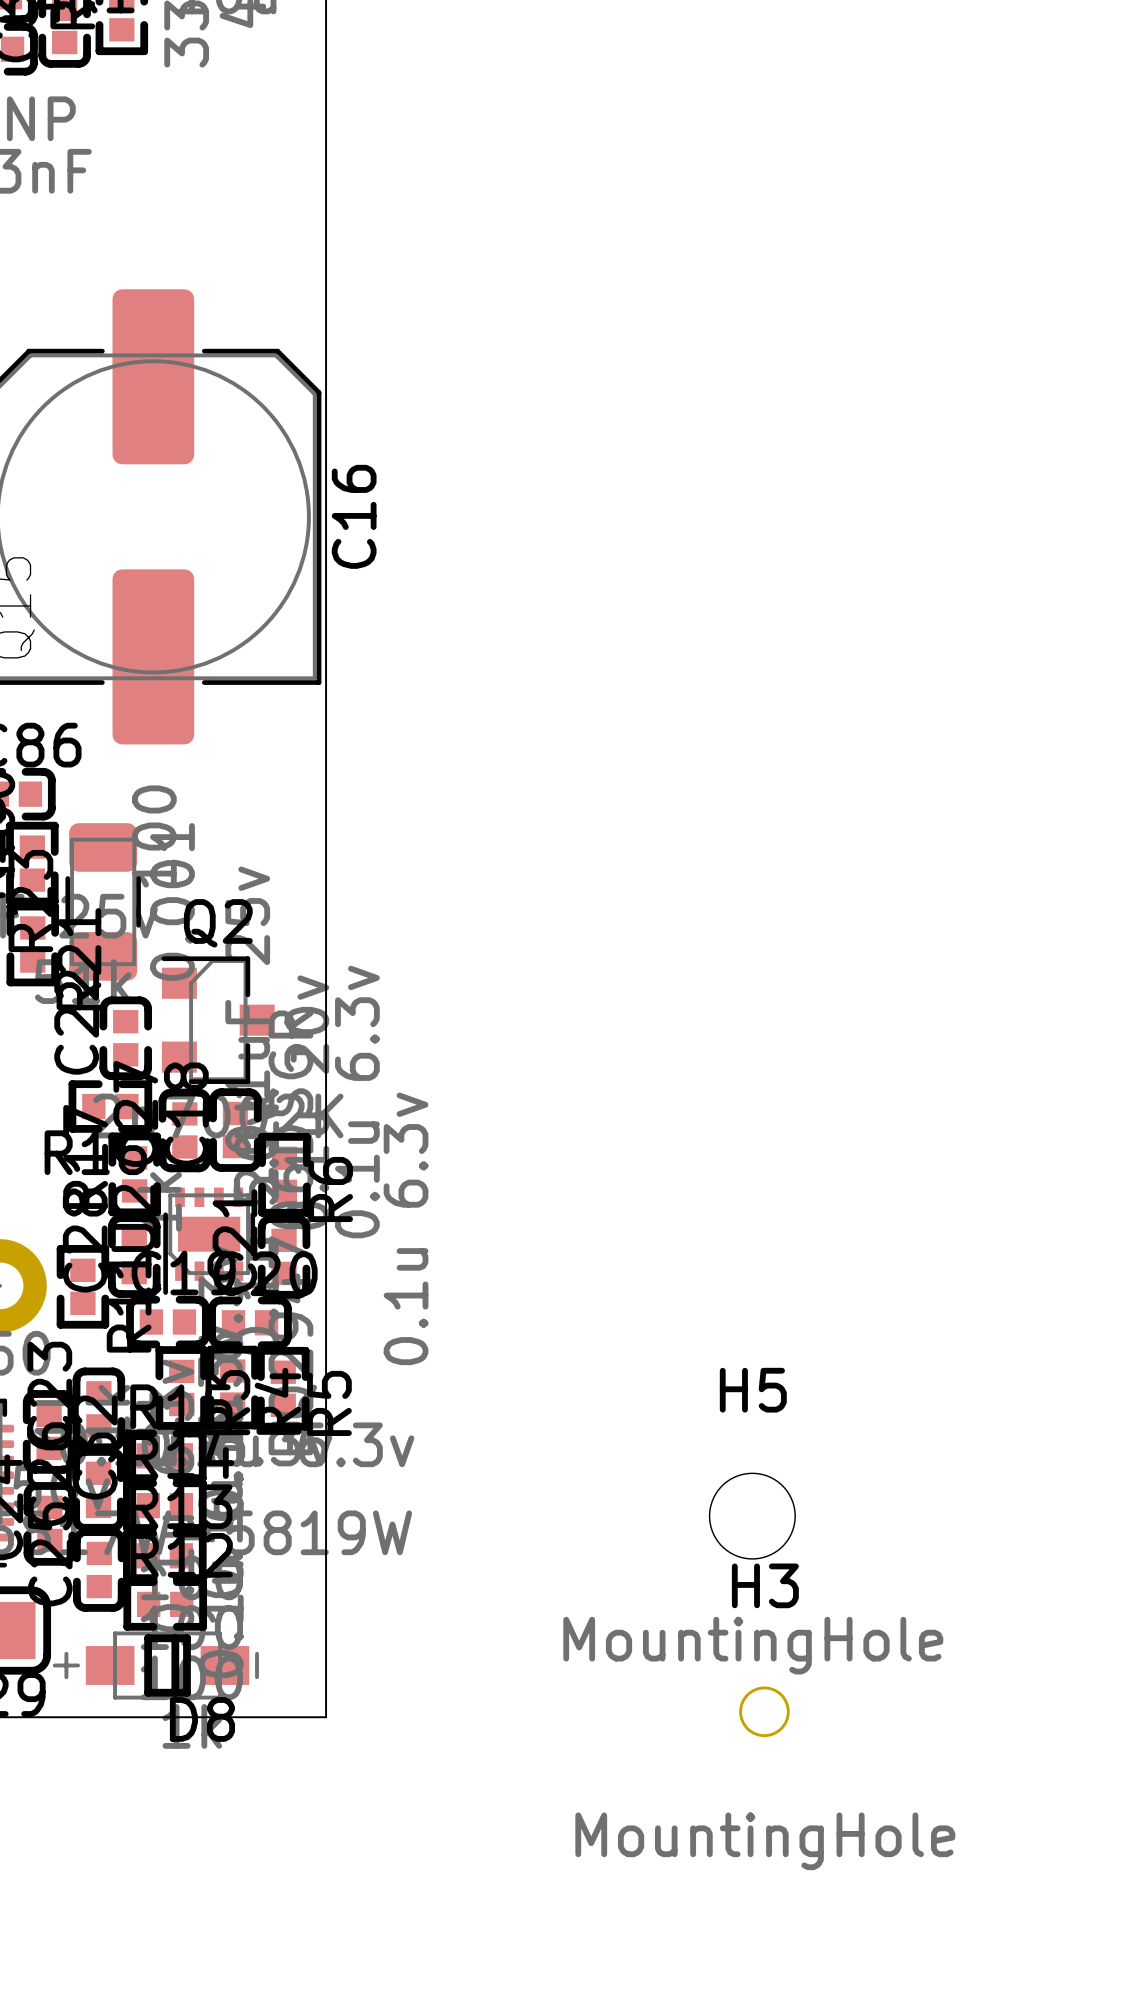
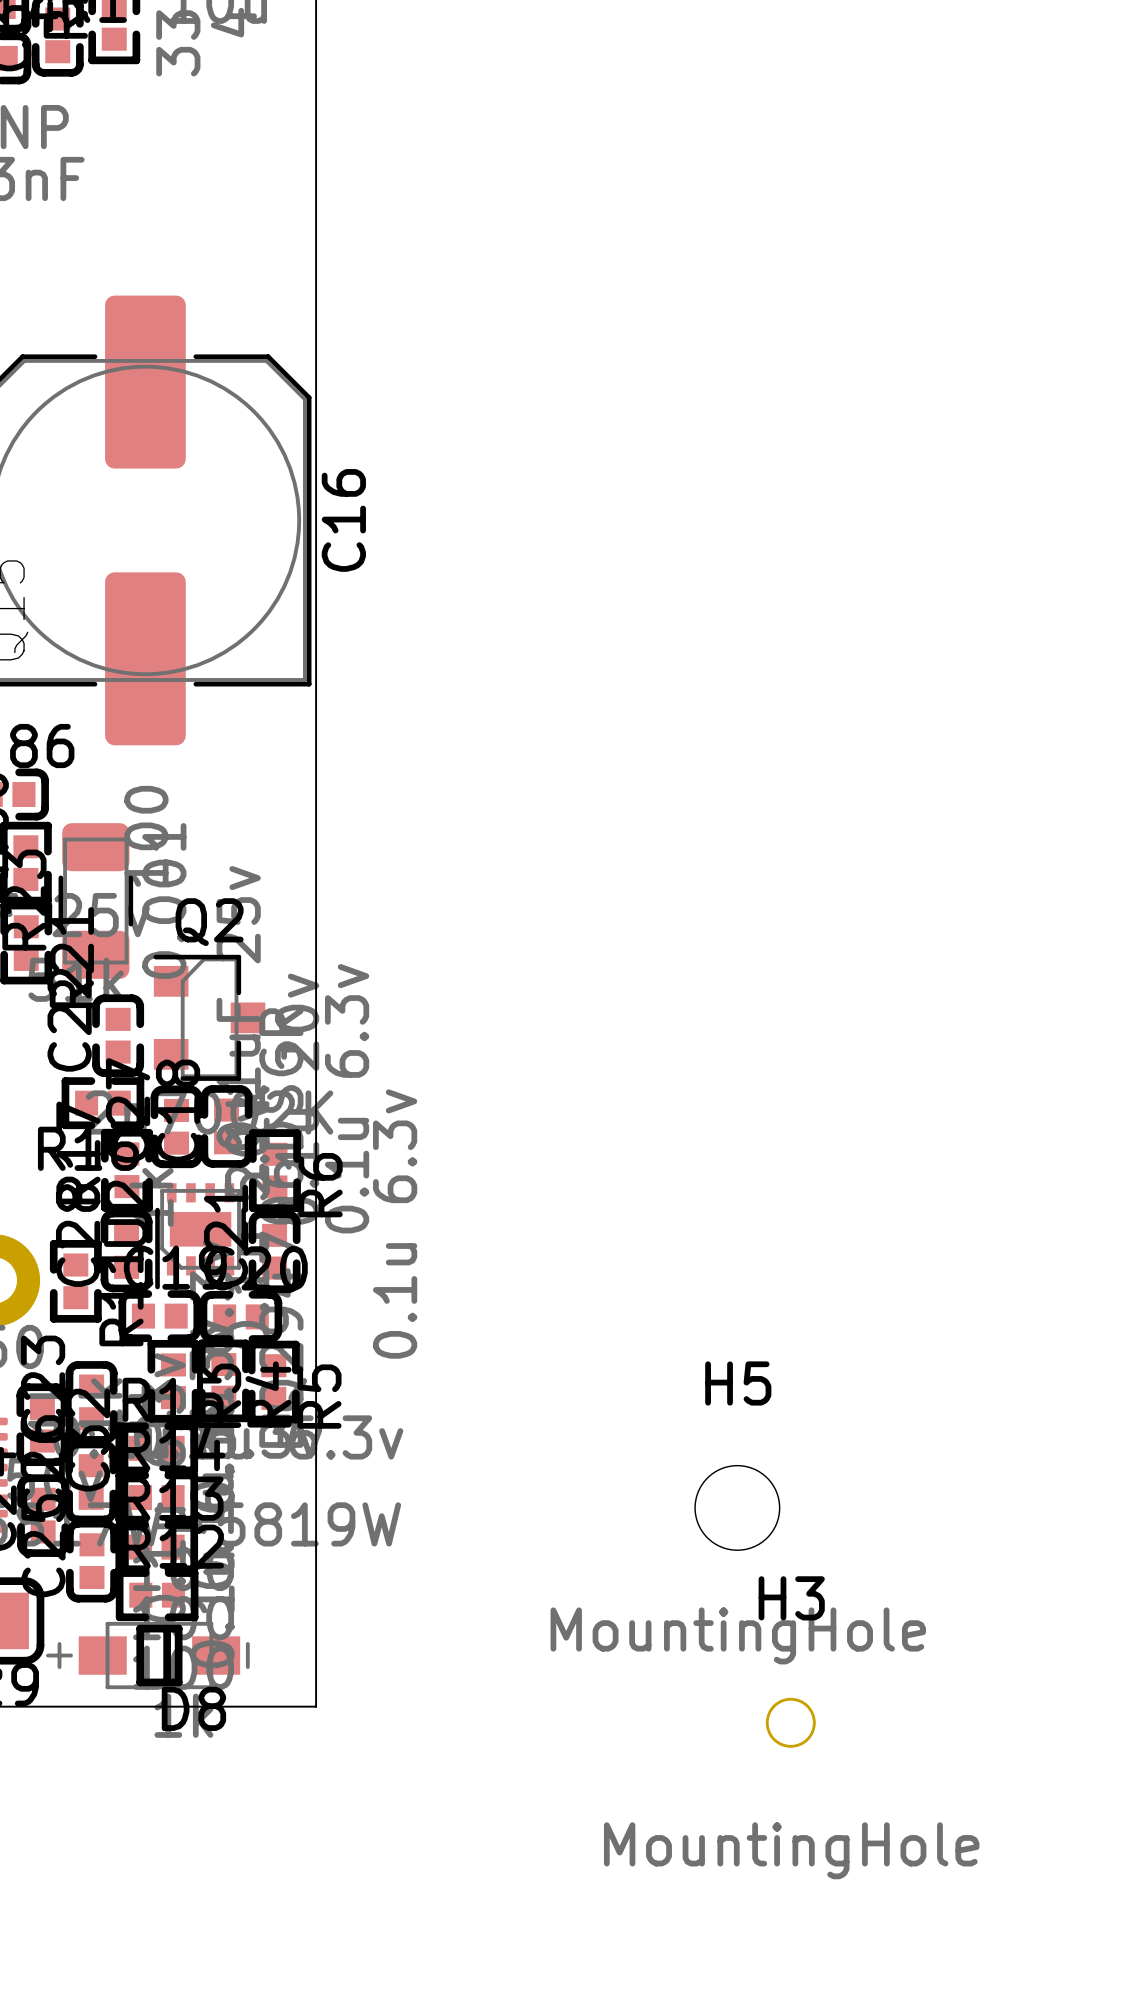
H3 position: (764, 1711) -> (790, 1722)

